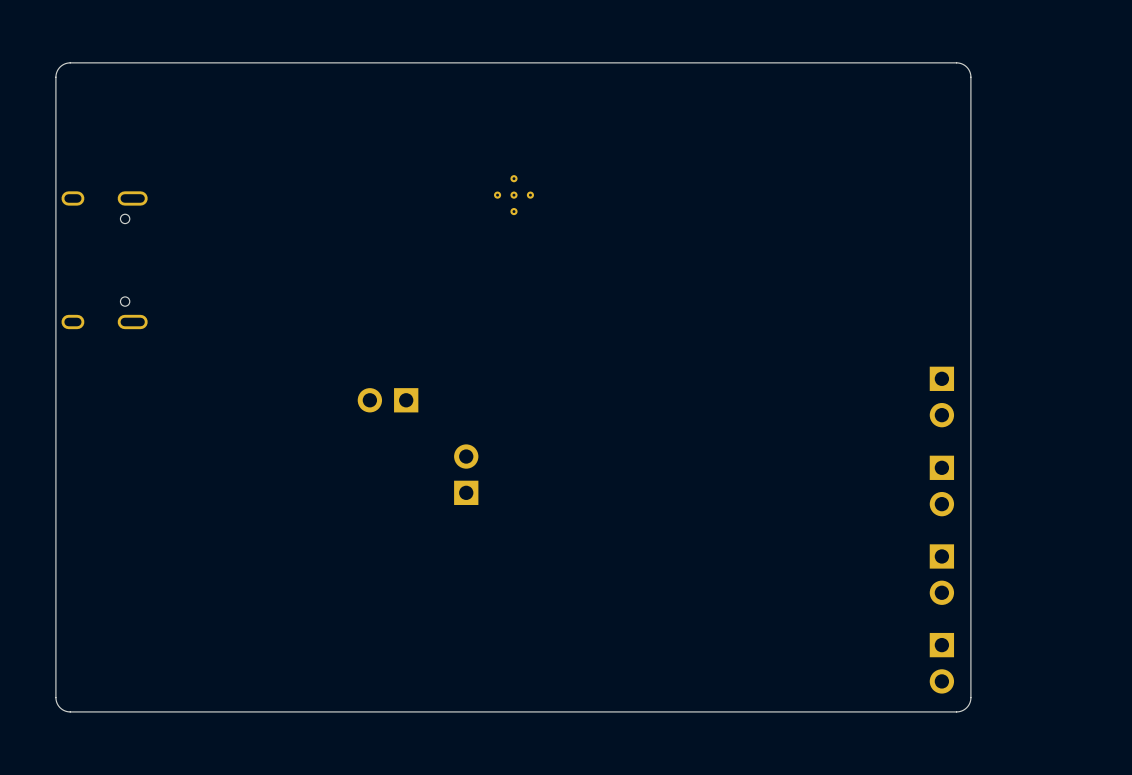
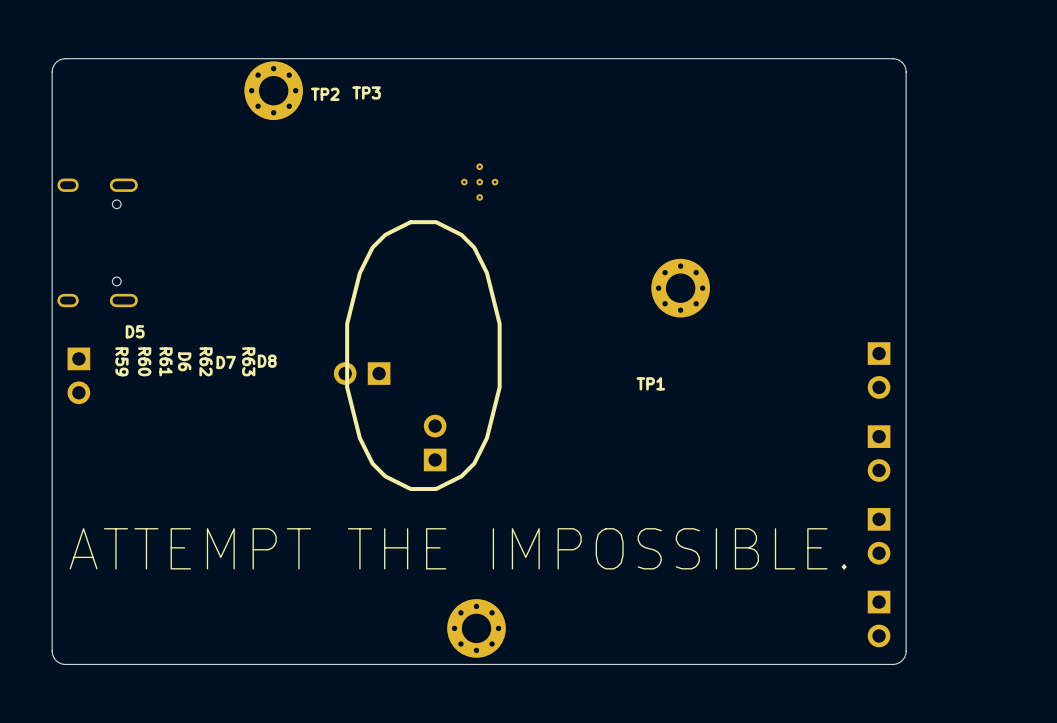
part: none -> (273, 90)
TP3: none -> (366, 92)
TP2: none -> (325, 94)
part: none -> (680, 288)
D5: none -> (135, 331)
text: none -> 0 (423, 355)
D8: none -> (267, 361)
R59: none -> (121, 361)
R60: none -> (144, 361)
R61: none -> (166, 361)
D6: none -> (184, 361)
R62: none -> (206, 361)
R63: none -> (248, 361)
D7: none -> (226, 362)
part: none -> (78, 375)
TP1: none -> (650, 383)
text: none -> ATTEMPT THE IMPOSSIBLE. (458, 548)
part: none -> (476, 628)

